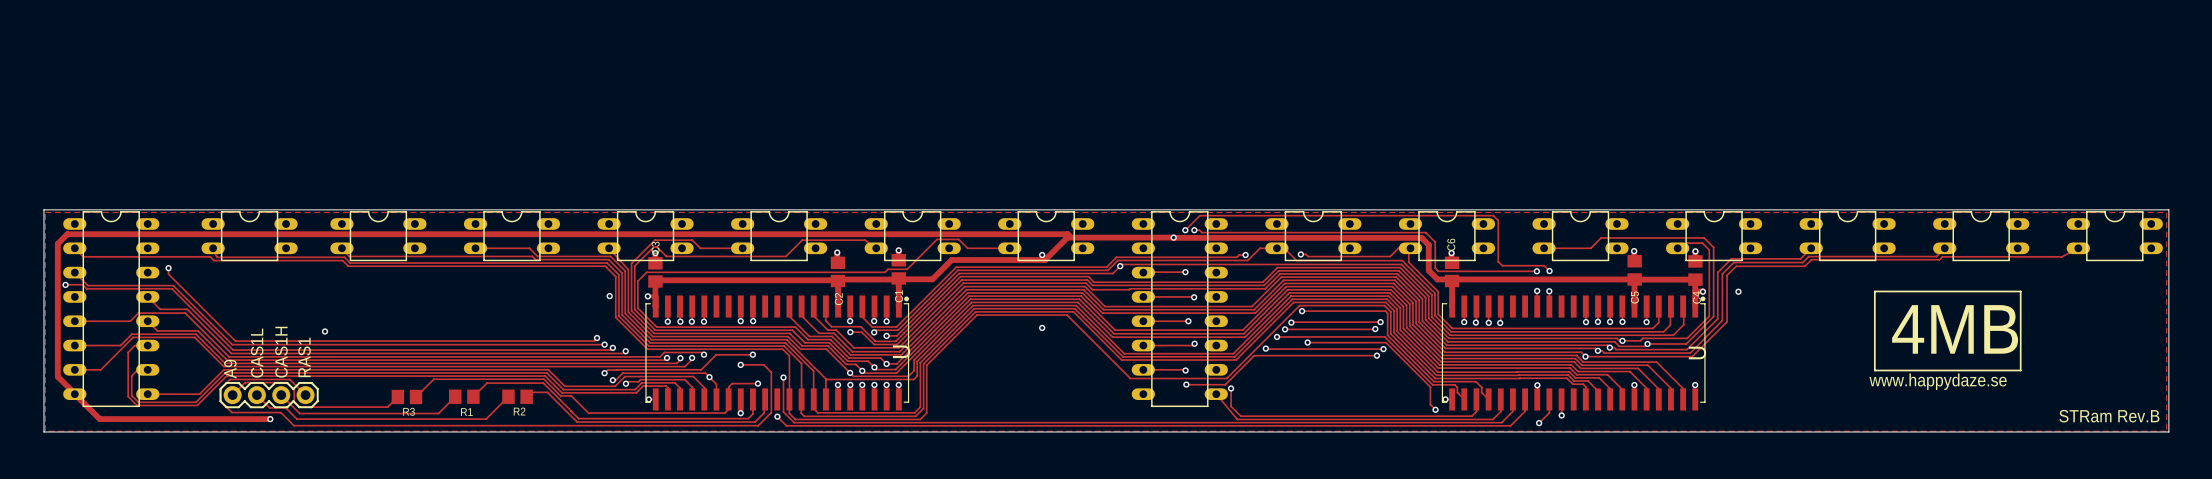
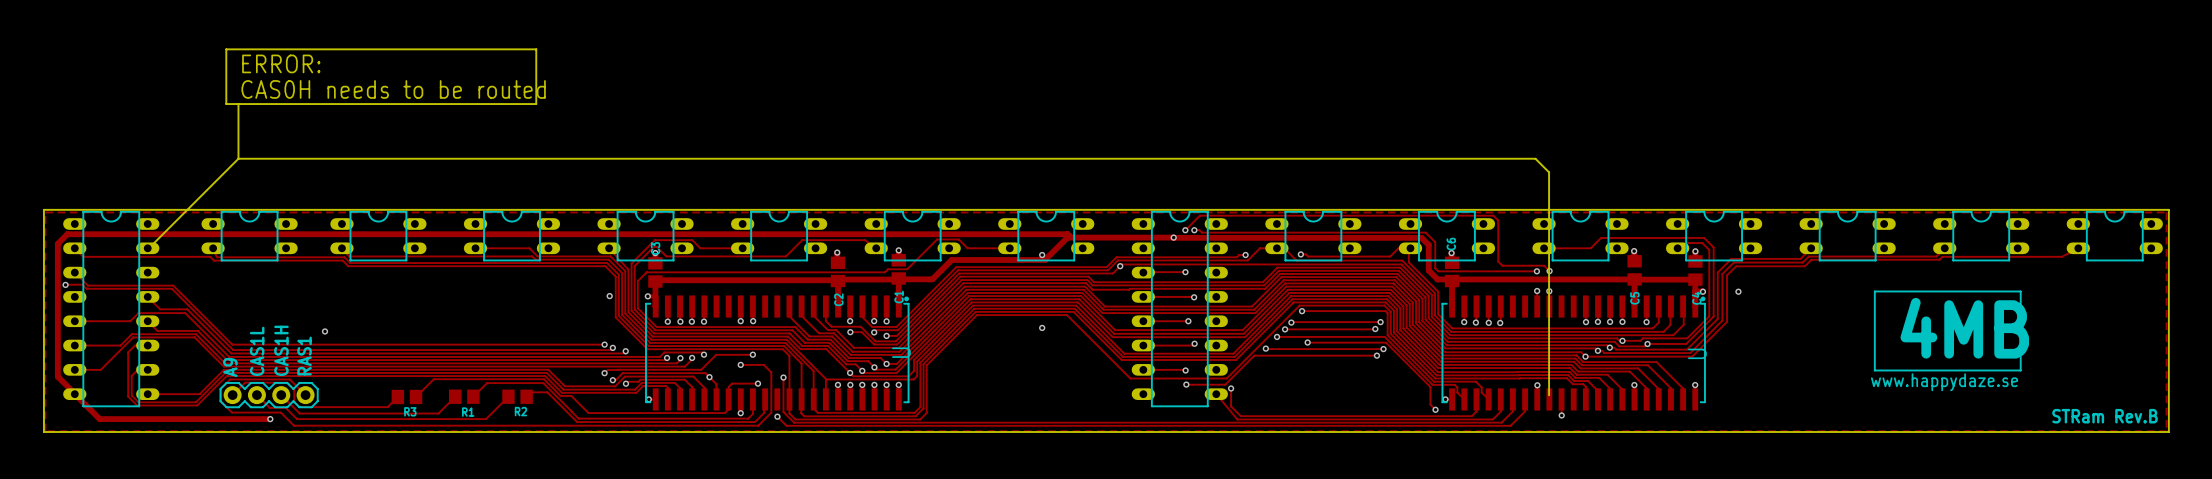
board edge: none -> (226, 49) (226, 104) (536, 104) (536, 49) (226, 49)
text: none -> ERROR: (281, 63)
text: none -> CAS0H needs to be routed (393, 89)
board edge: none -> (238, 104) (238, 158)
board edge: none -> (238, 158) (153, 243)
board edge: none -> (238, 158) (1535, 158) (1549, 172) (1549, 395)
track: (168, 268) (168, 274) (235, 341) (594, 341) (597, 338) -> none
via: (168, 268) -> none
via: (597, 338) -> none
track: (1549, 399) (1549, 412) (1539, 423) -> none
via: (1539, 423) -> none

